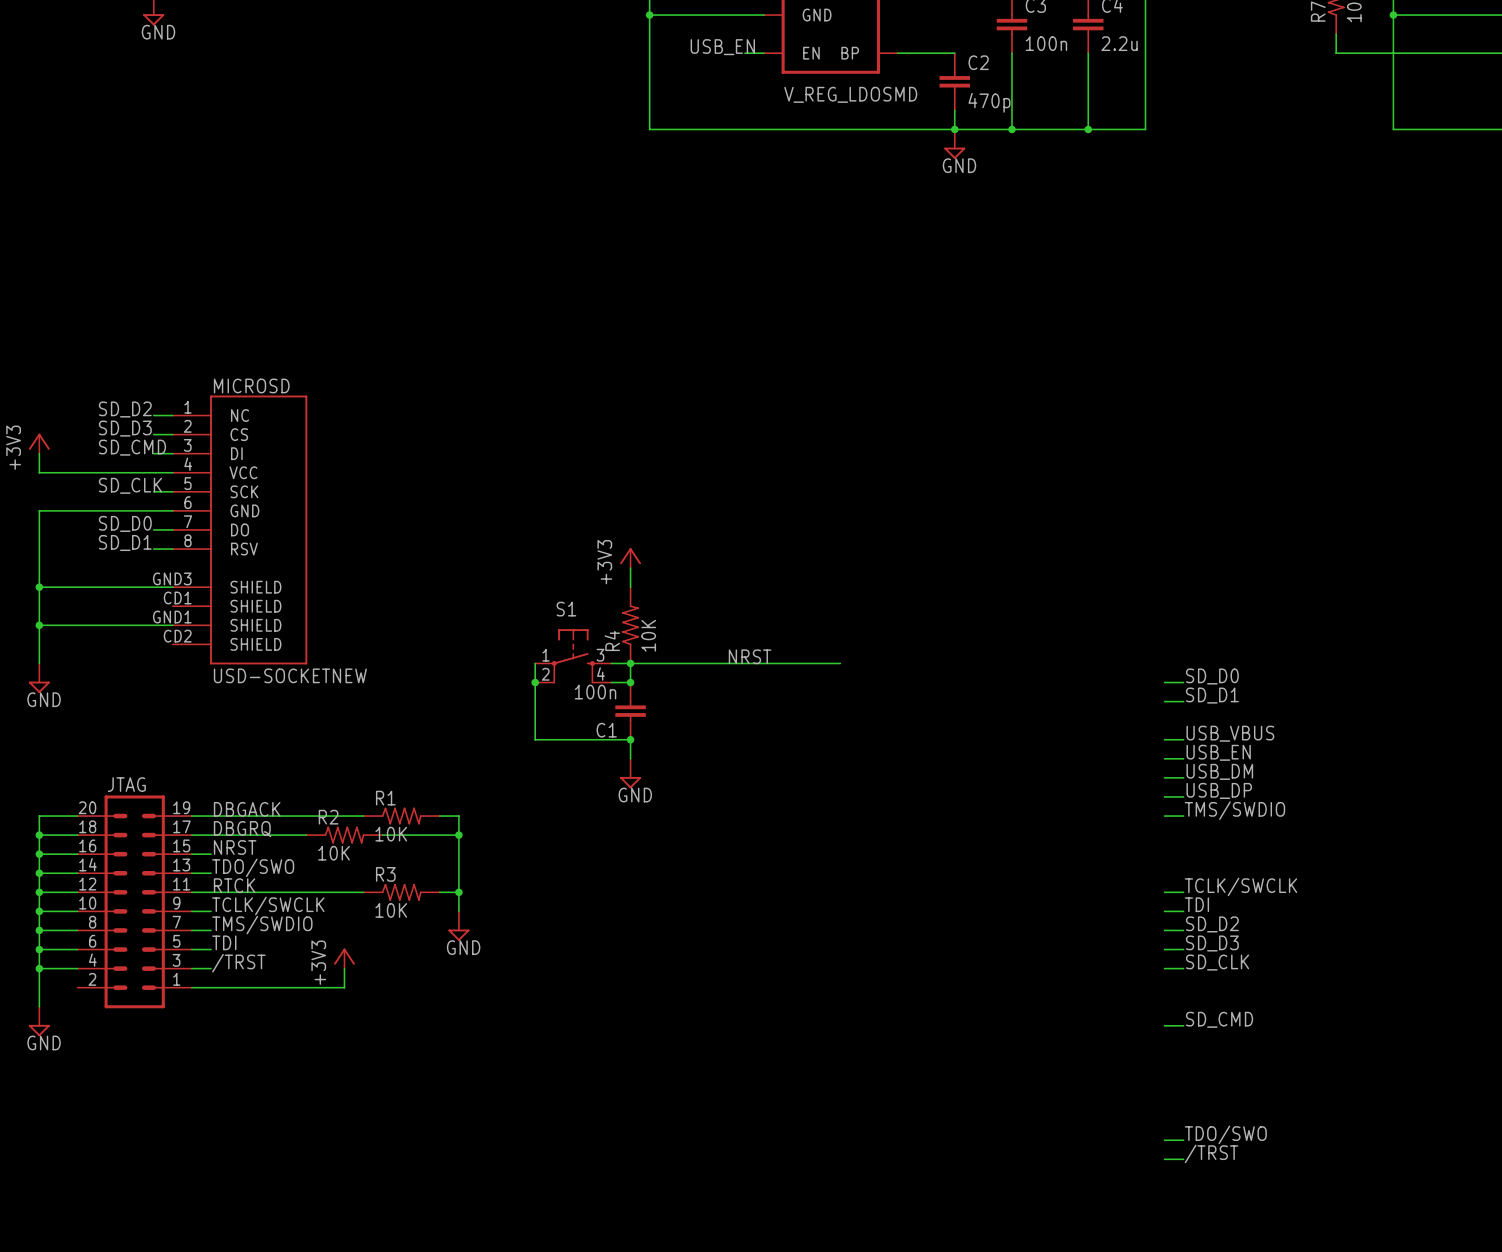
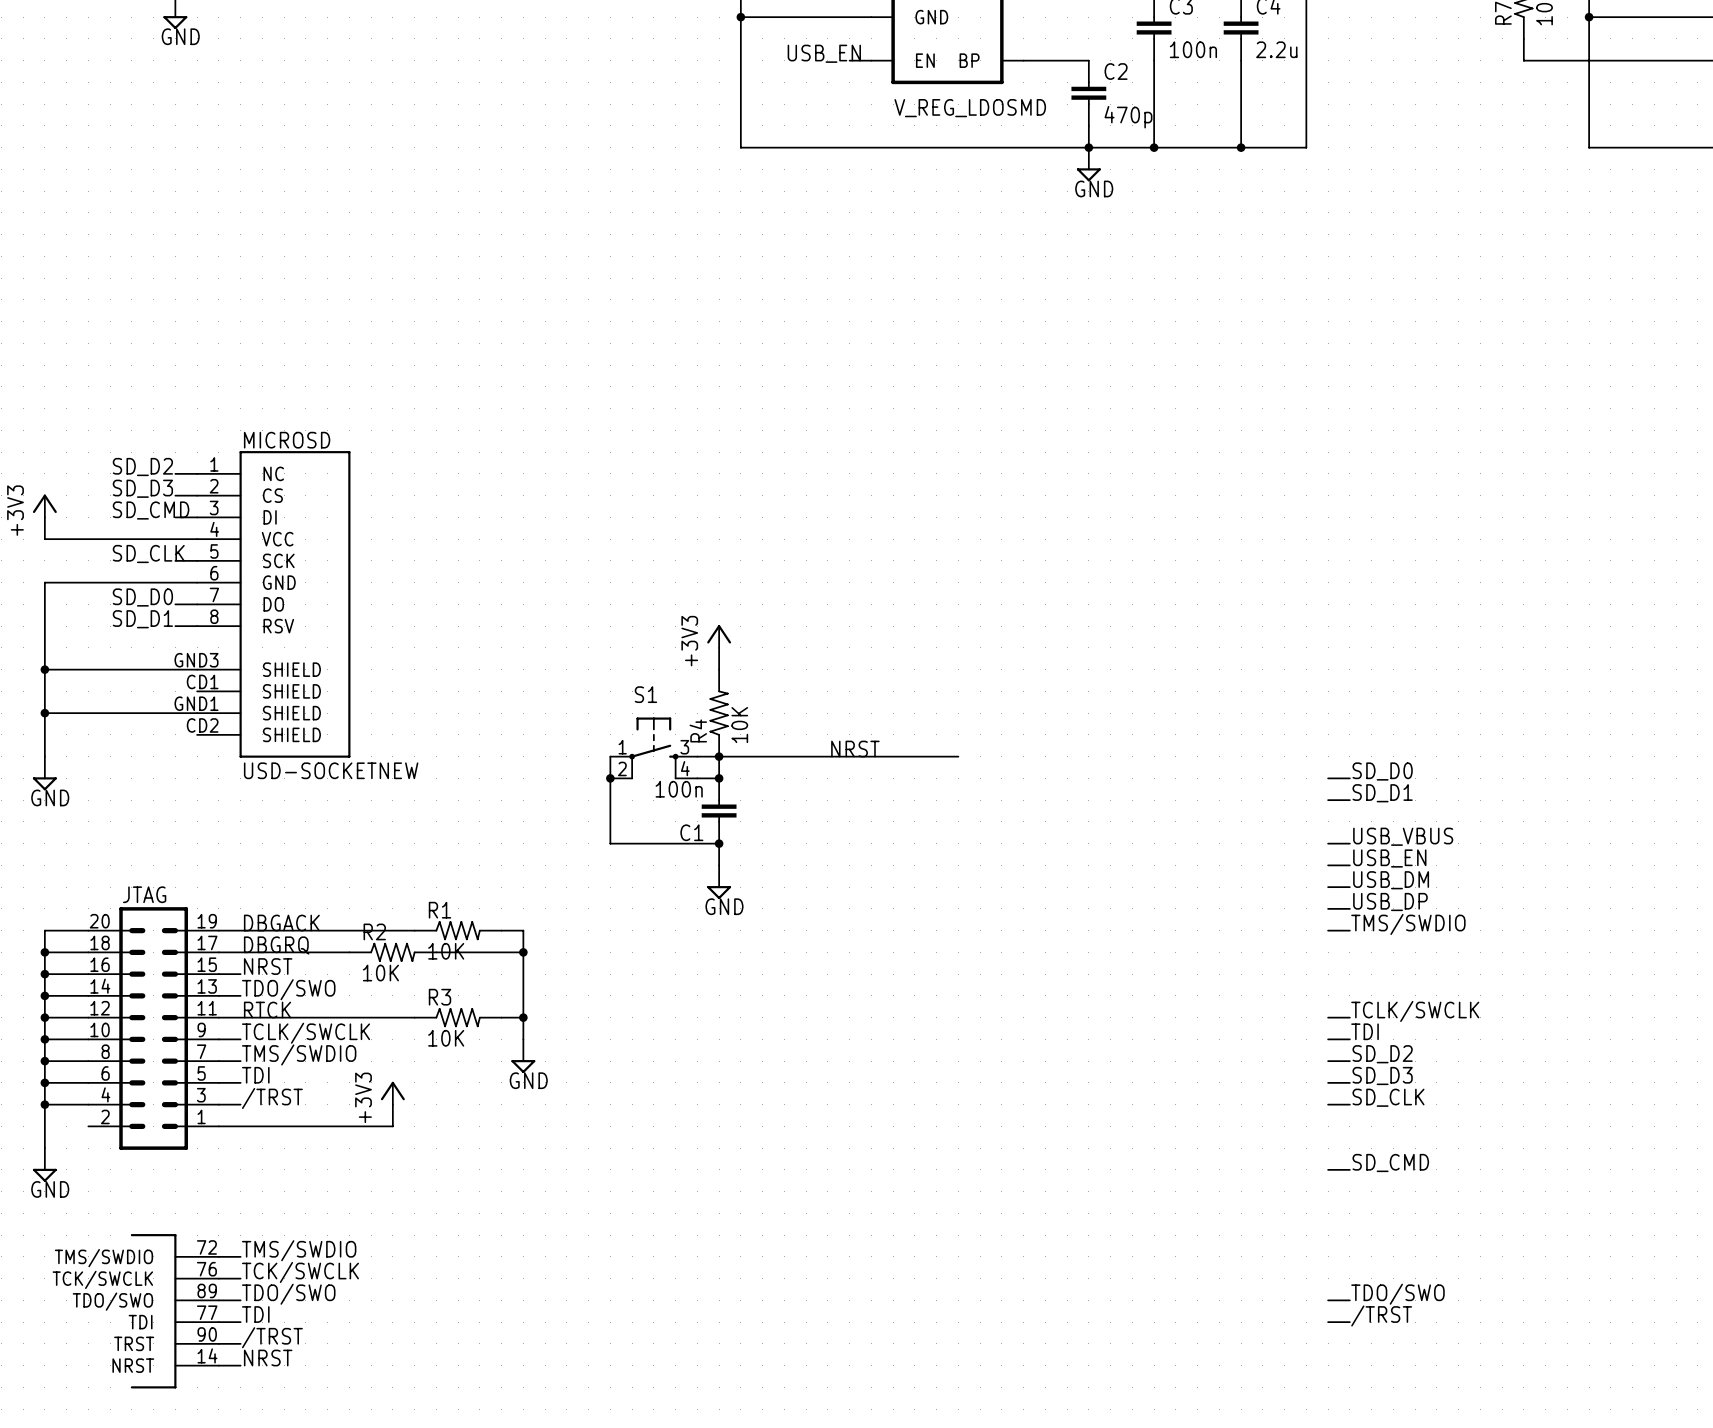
label: none -> TMS/SWDIO (299, 1250)
wire: none -> (218, 1256) (240, 1256)
label: none -> TCK/SWCLK (300, 1272)
wire: none -> (218, 1278) (240, 1278)
label: none -> TDO/SWO (288, 1294)
wire: none -> (218, 1300) (240, 1300)
part: none -> (174, 1311)
label: none -> TDI (255, 1314)
wire: none -> (218, 1322) (240, 1322)
label: none -> /TRST (272, 1337)
wire: none -> (218, 1343) (240, 1343)
label: none -> NRST (268, 1358)
wire: none -> (218, 1365) (240, 1365)

